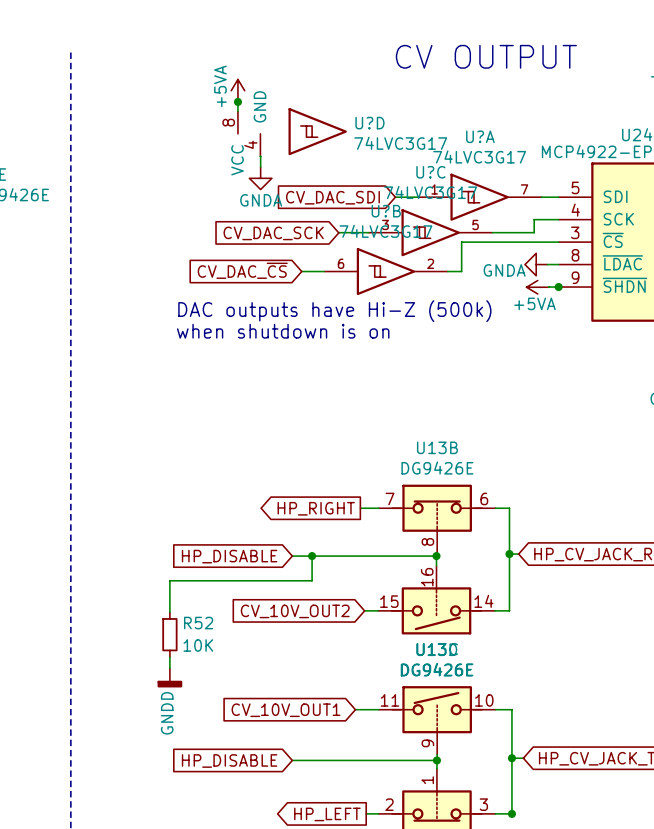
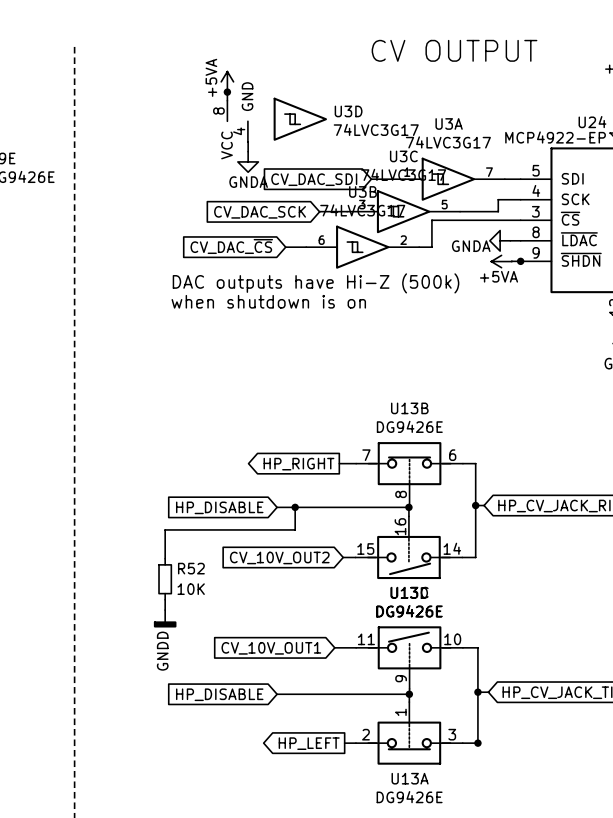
U?D name: U?D (369, 123) -> U3D (348, 111)
U?A name: U?A (480, 136) -> U3A (449, 123)
U?C name: U?C (430, 172) -> U3C (403, 156)
U?B name: U?B (386, 211) -> U3B (362, 191)

